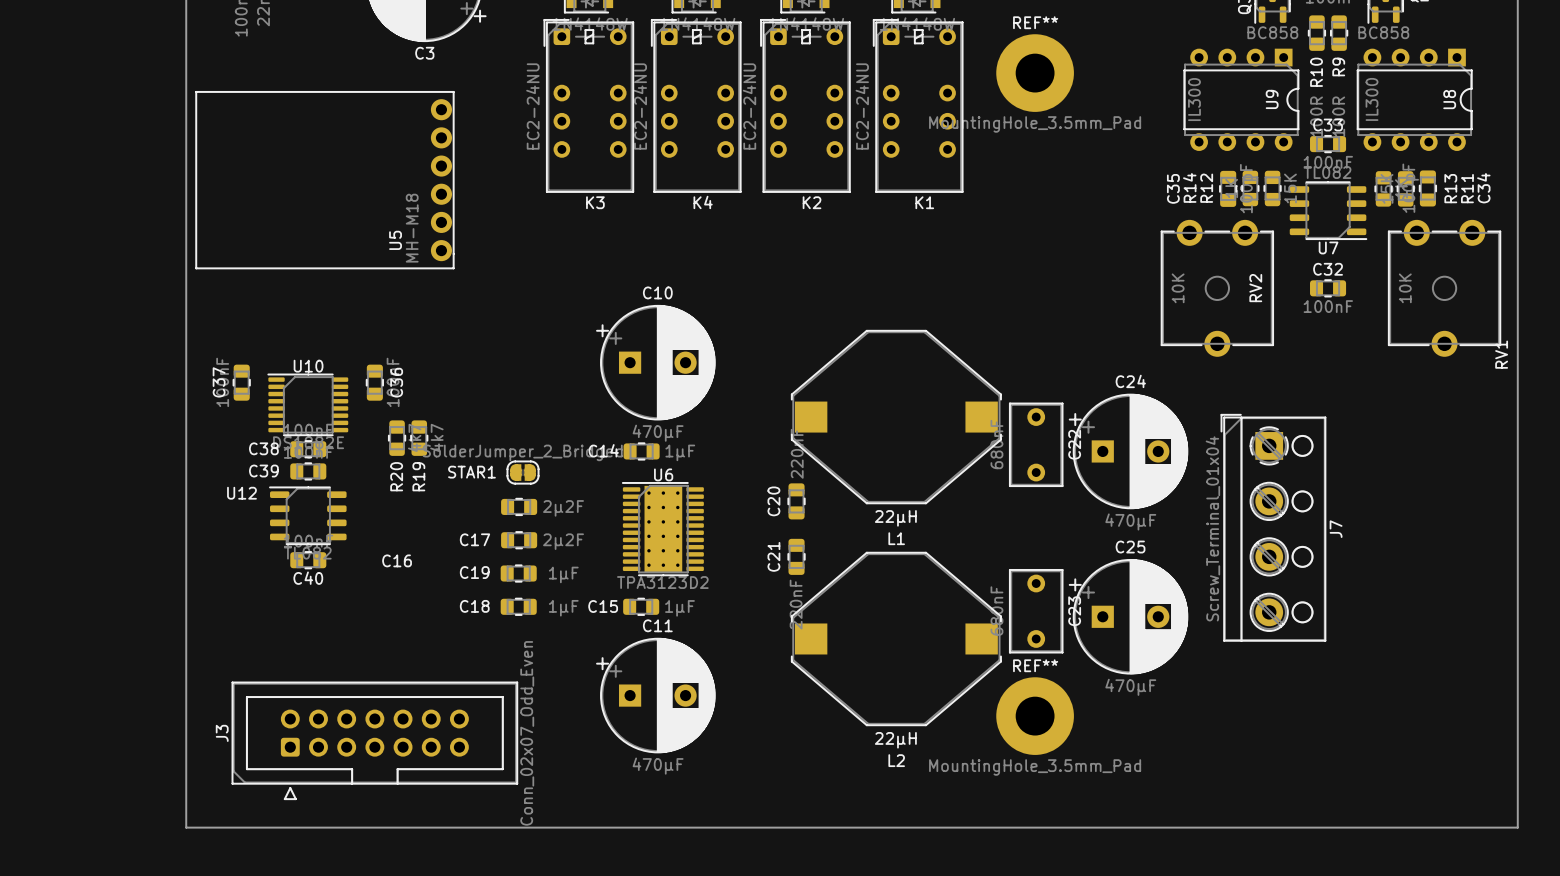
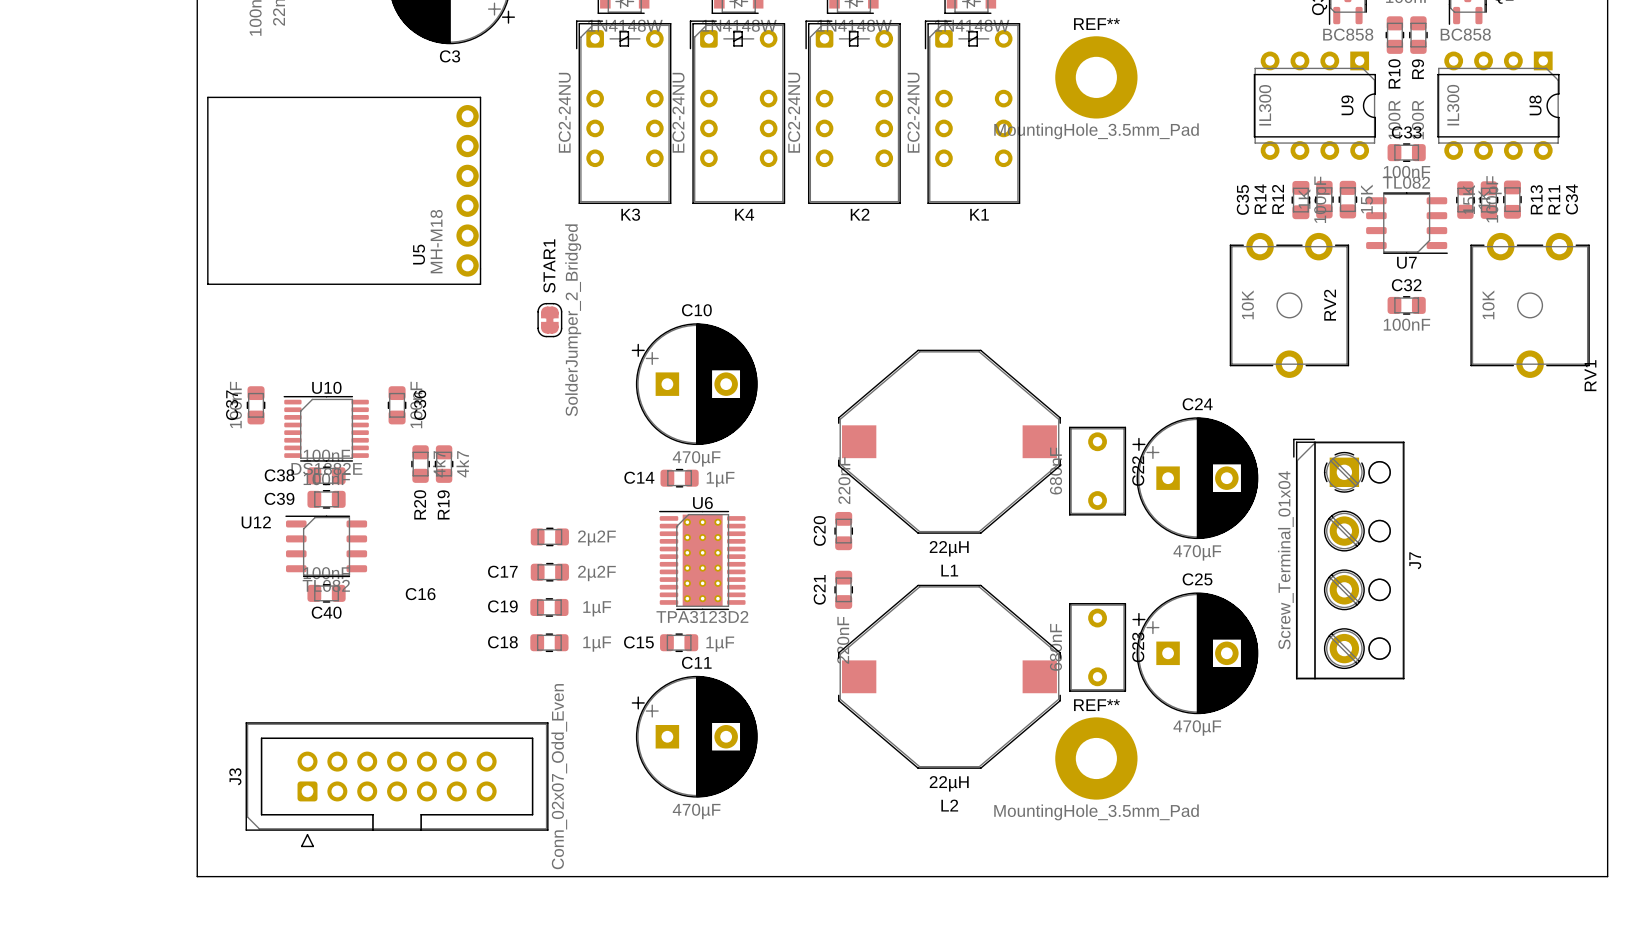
STAR1 rotation: 0° (523, 472) -> 90° clockwise (549, 320)
STAR1 position: (523, 472) -> (549, 320)

